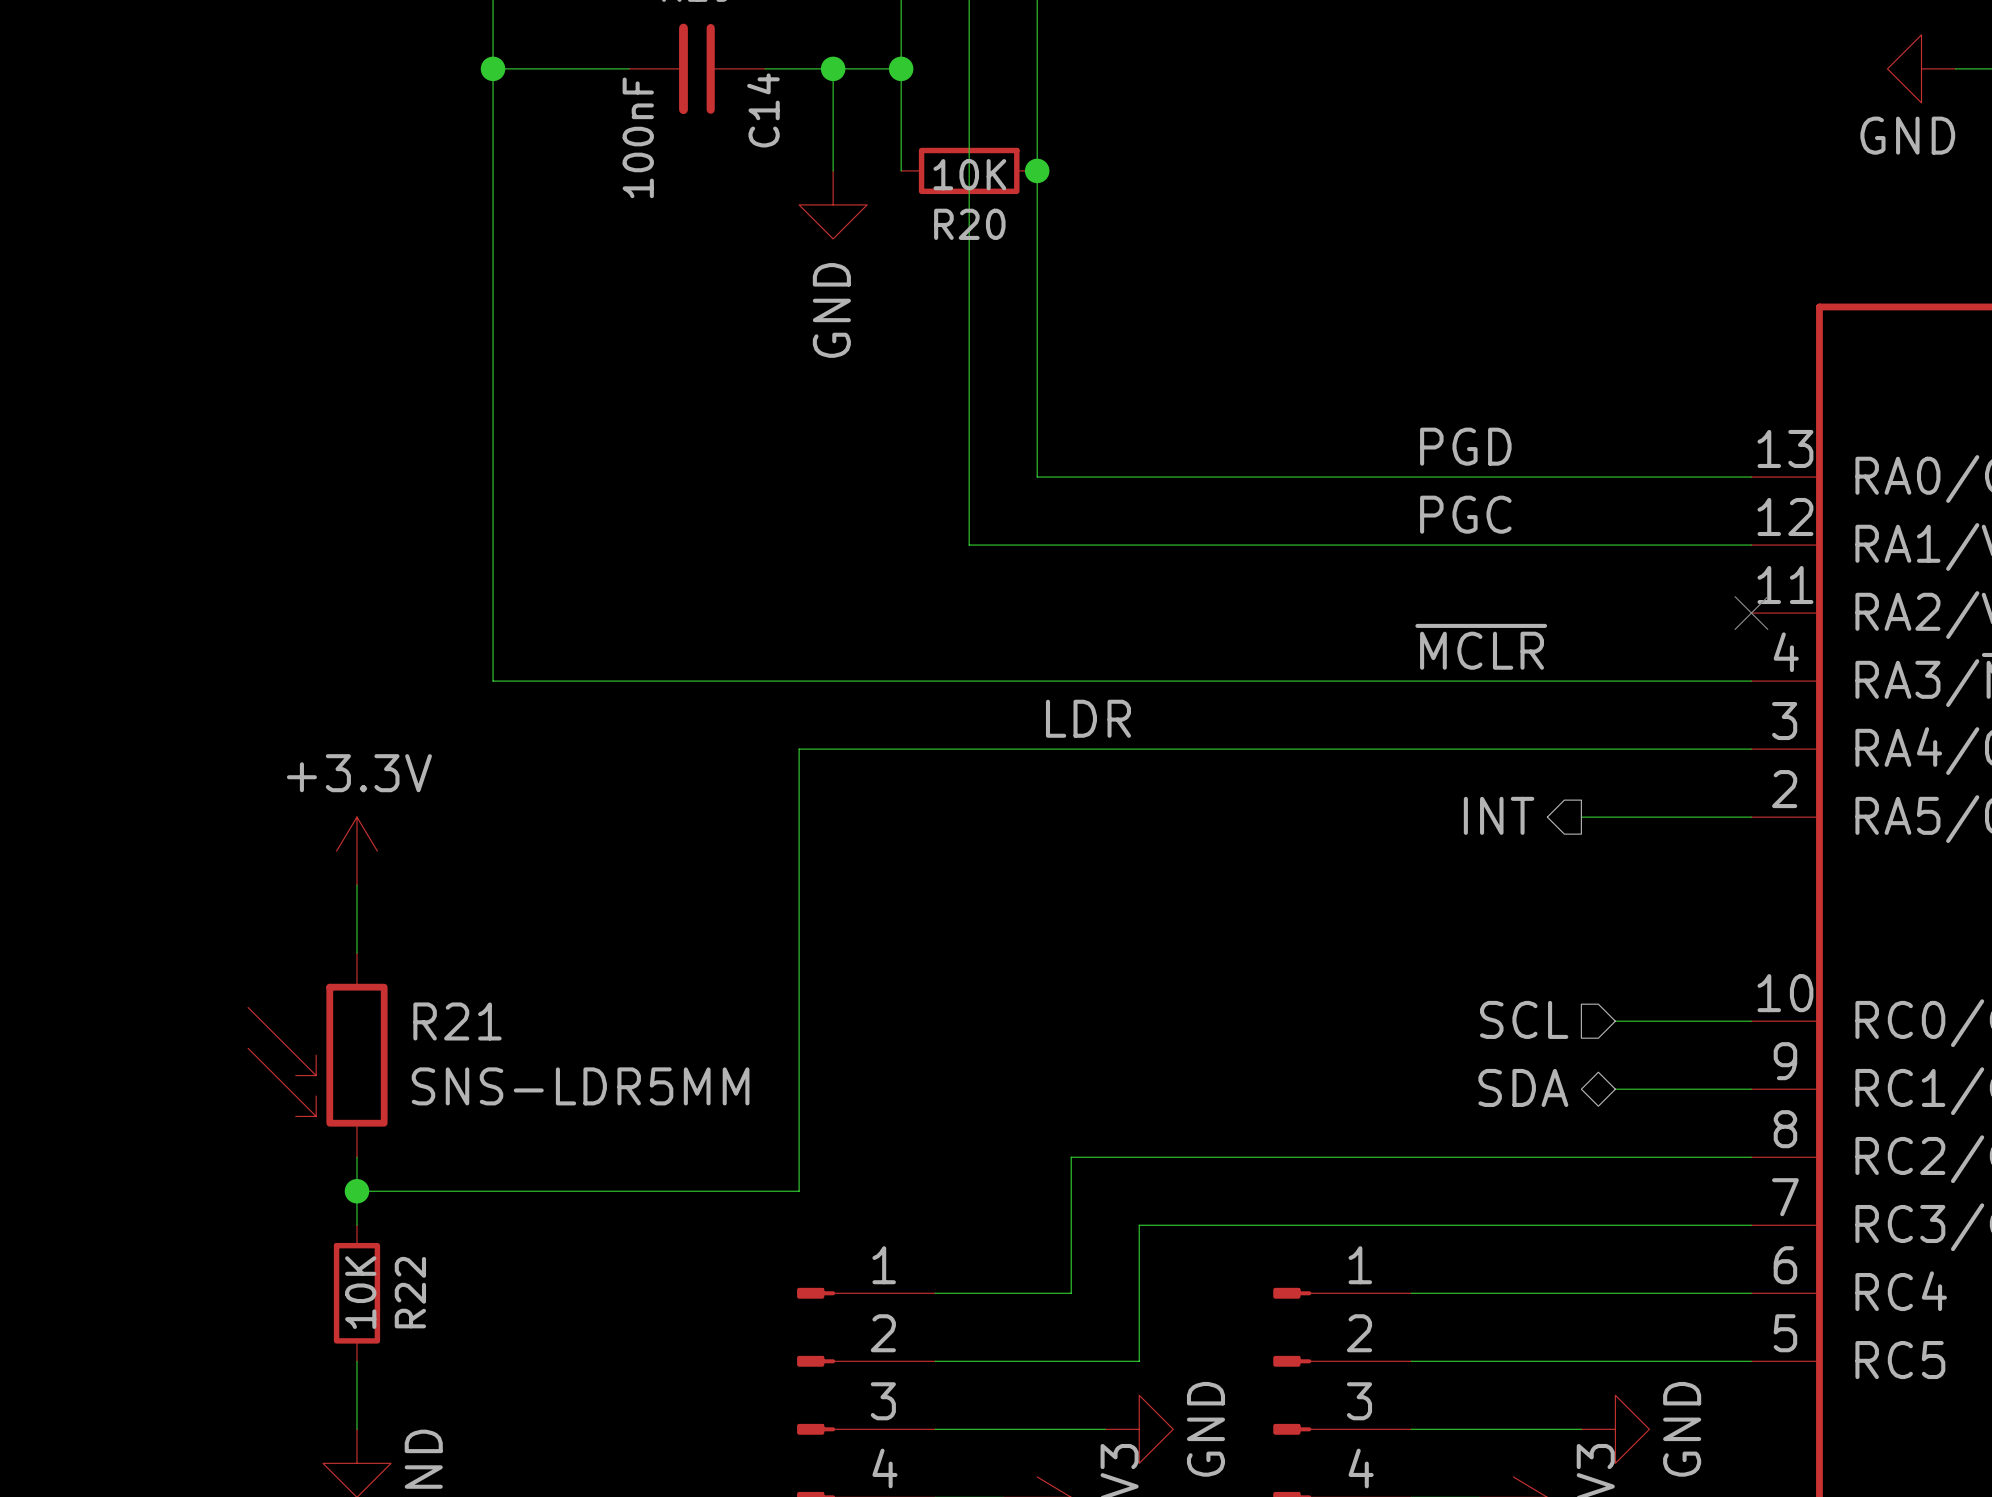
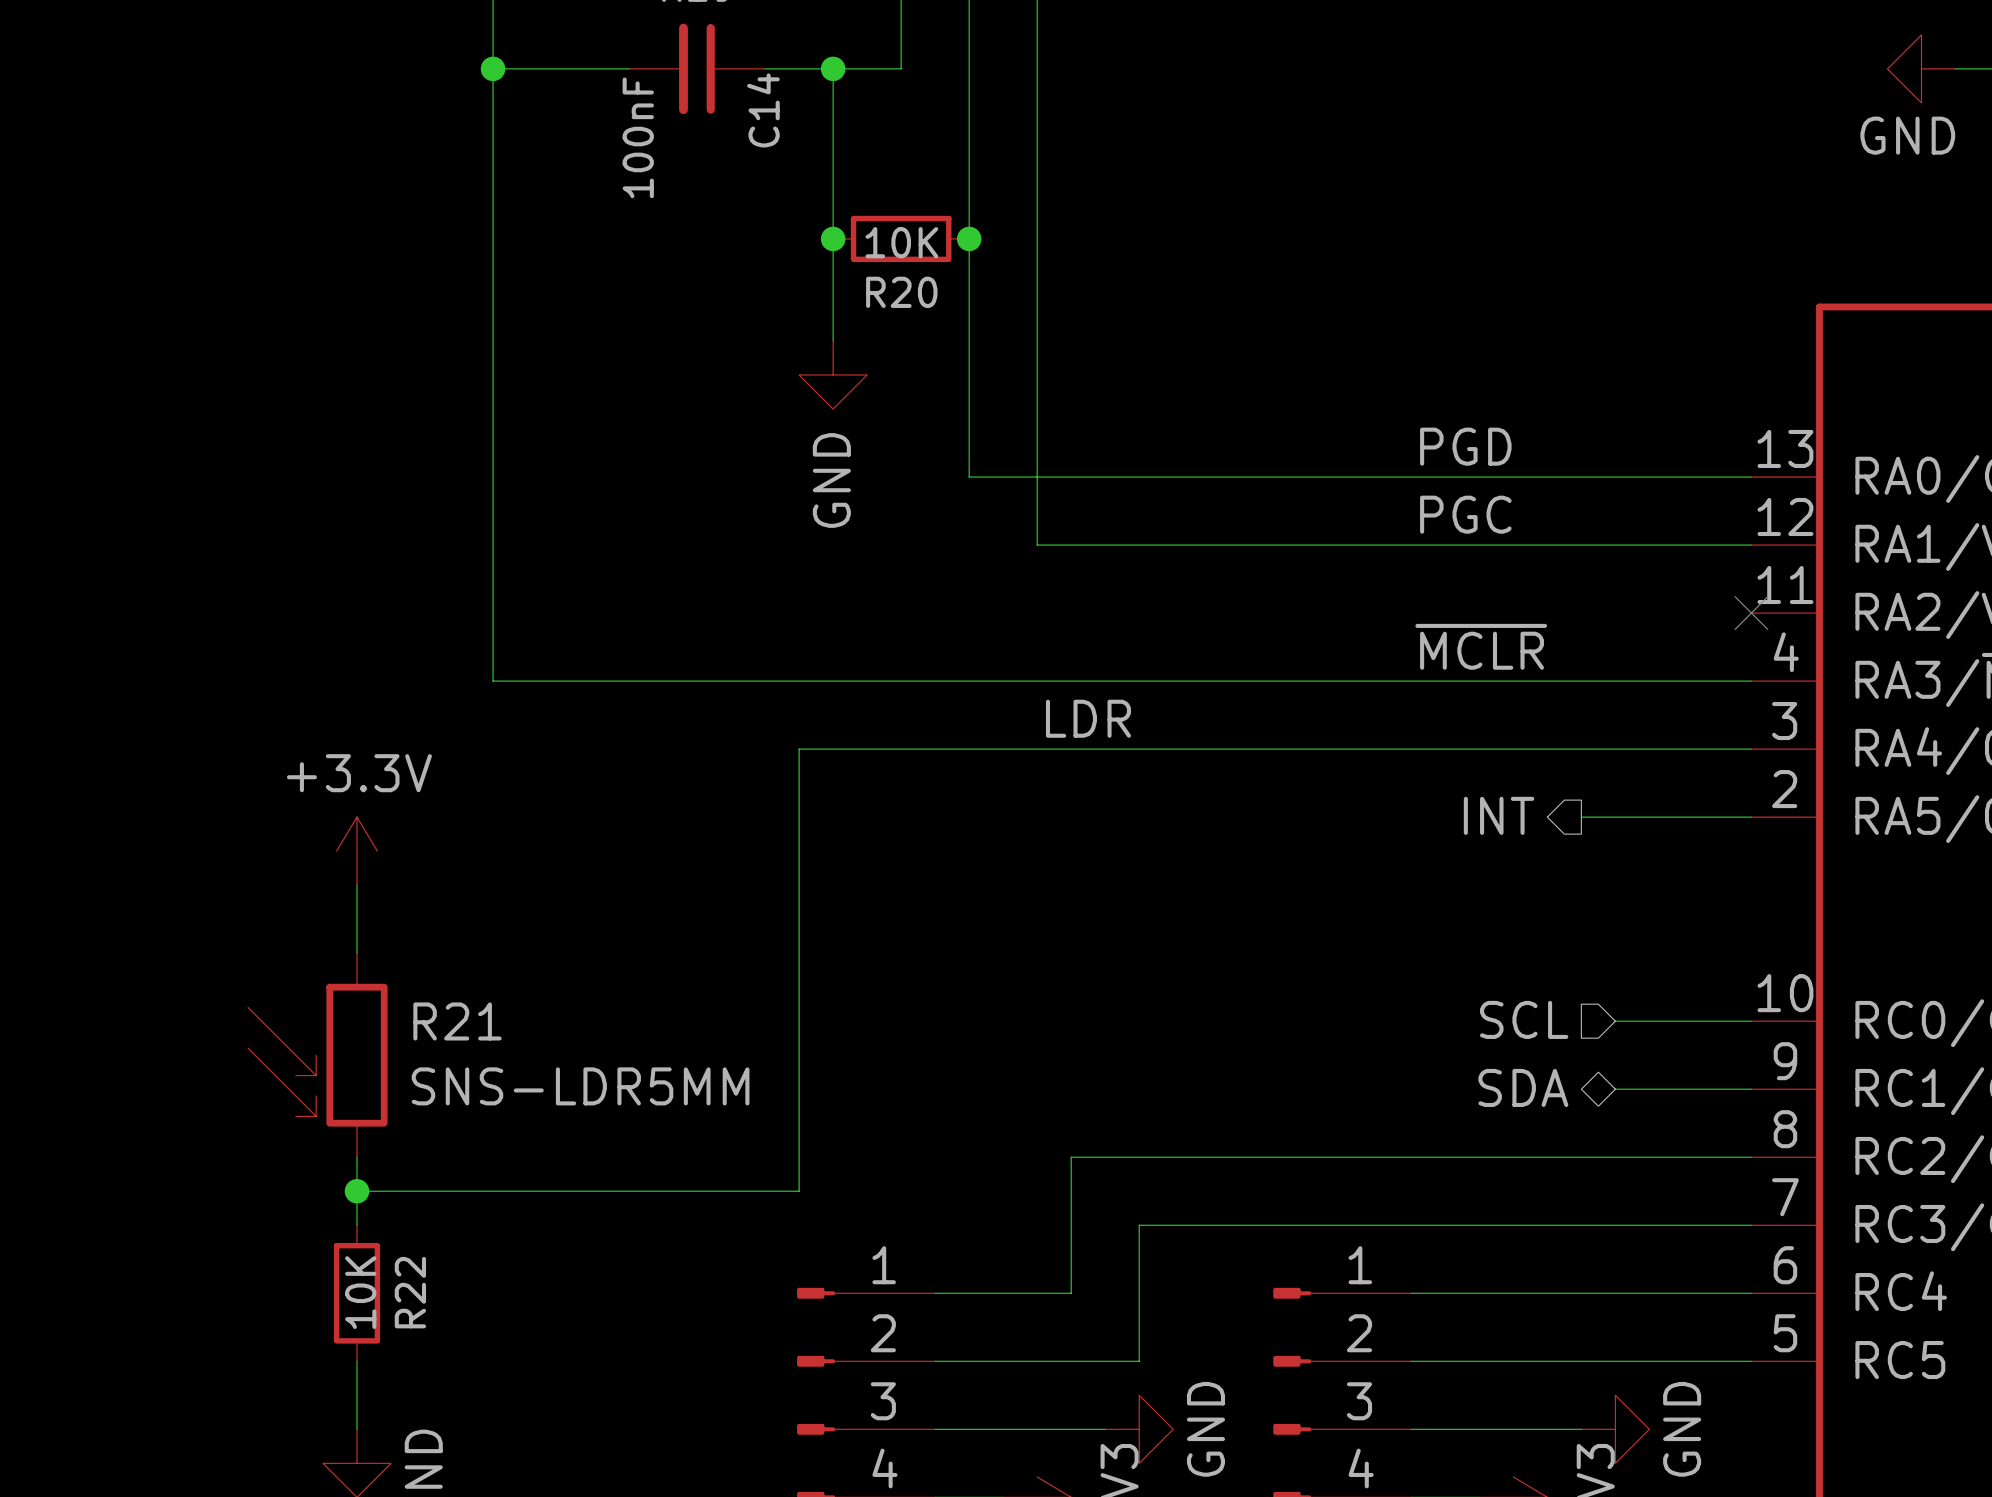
wire: (901, 68) (901, 170) -> none
junction: (901, 68) -> none
wire: none -> (833, 170) (833, 340)
R20 position: (969, 170) -> (901, 238)
junction: (1037, 170) -> none
power symbol position: GND (833, 204) -> GND (833, 374)
junction: none -> (833, 238)
junction: none -> (969, 238)
wire: (969, 477) (969, 545) (1037, 545) -> (969, 477) (1037, 477) (1037, 545)

